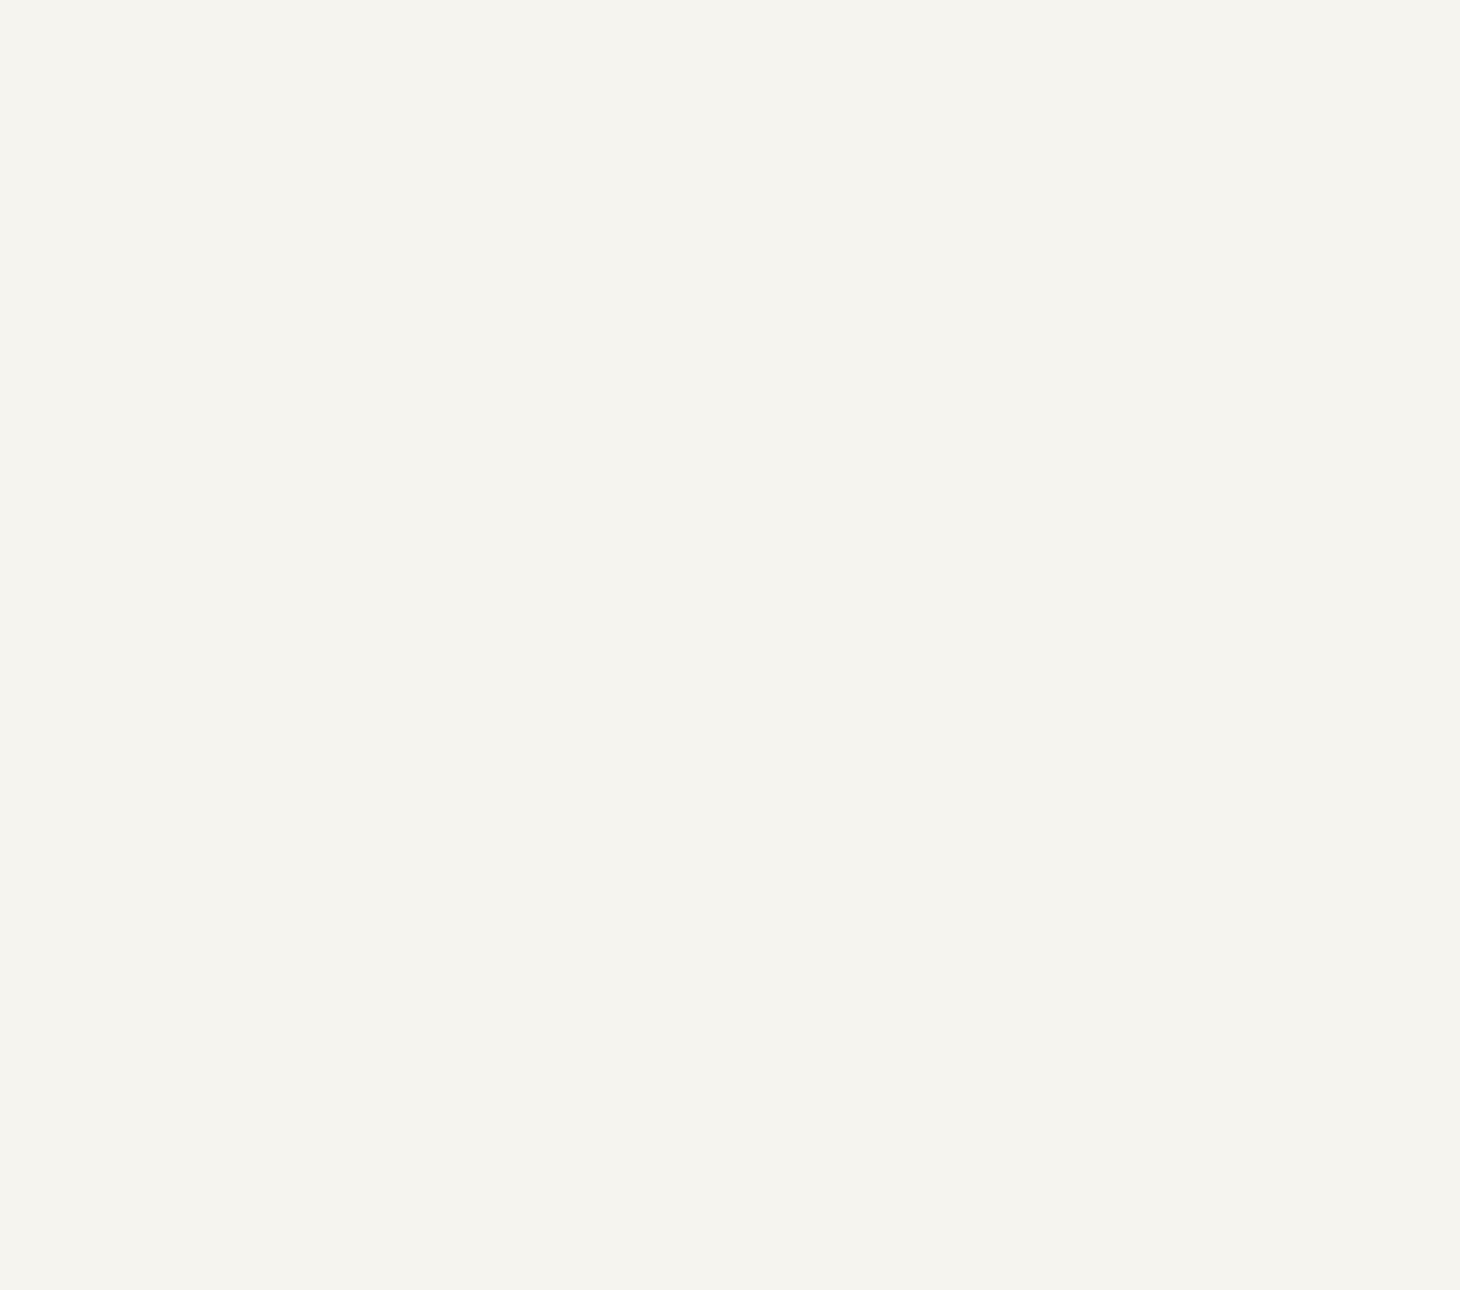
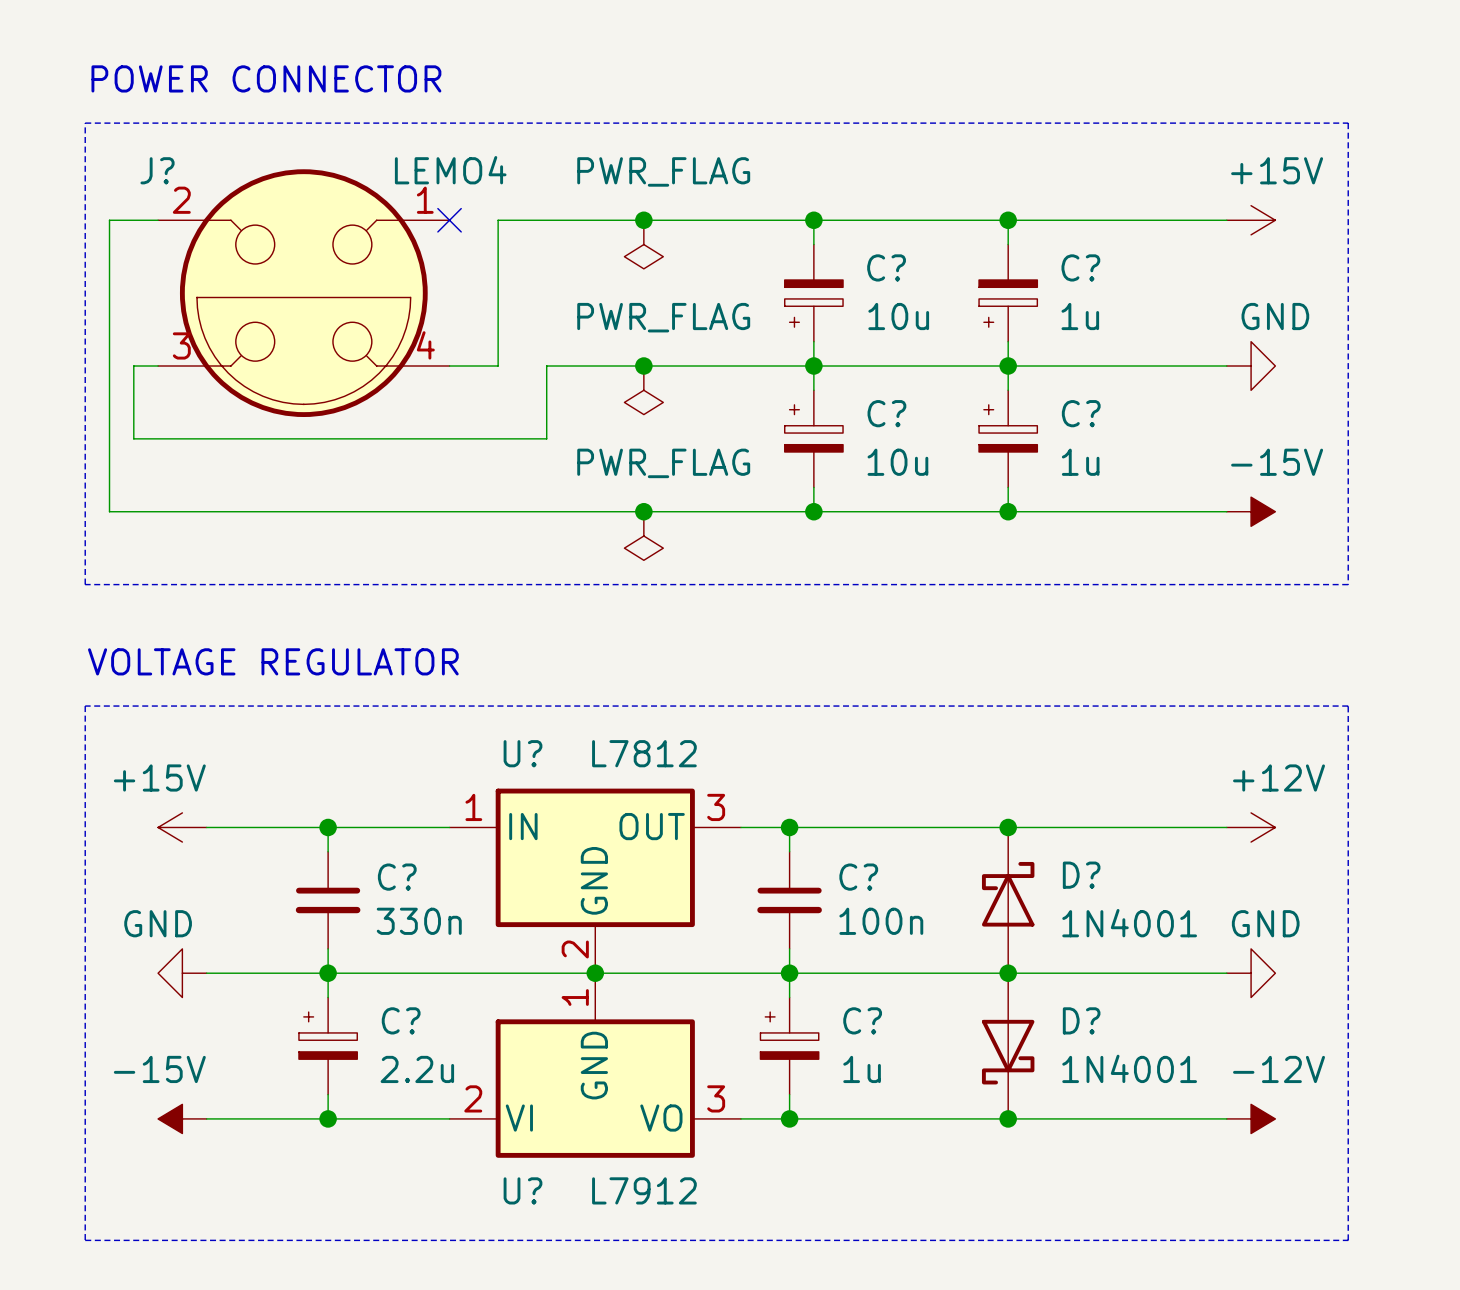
text: none -> POWER CONNECTOR (266, 78)
line: none -> (85, 123) (85, 584) (1348, 584) (1348, 123) (85, 123)
wire: none -> (158, 220) (109, 220) (109, 511) (1226, 511)
no-connect mark: none -> (449, 220)
junction: none -> (643, 220)
wire: none -> (813, 220) (813, 244)
junction: none -> (813, 220)
wire: none -> (1008, 220) (1008, 244)
junction: none -> (1008, 220)
wire: none -> (1226, 220) (498, 220) (498, 366) (449, 366)
power symbol: none -> +15V (1251, 220)
power symbol: none -> PWR_FLAG (643, 244)
J?: none -> LEMO4 (303, 293)
C?: none -> 10u (813, 293)
C?: none -> 1u (1008, 293)
wire: none -> (813, 341) (813, 390)
wire: none -> (1008, 341) (1008, 390)
wire: none -> (158, 366) (133, 366) (133, 438) (546, 438) (546, 366) (1226, 366)
junction: none -> (643, 366)
junction: none -> (813, 366)
junction: none -> (1008, 366)
power symbol: none -> GND (1251, 366)
power symbol: none -> PWR_FLAG (643, 390)
C?: none -> 10u (813, 438)
C?: none -> 1u (1008, 438)
wire: none -> (813, 487) (813, 511)
wire: none -> (1008, 487) (1008, 511)
junction: none -> (643, 511)
junction: none -> (813, 511)
junction: none -> (1008, 511)
power symbol: none -> -15V (1251, 511)
power symbol: none -> PWR_FLAG (643, 536)
text: none -> VOLTAGE REGULATOR (273, 661)
line: none -> (85, 706) (85, 1240) (1348, 1240) (1348, 706) (85, 706)
power symbol: none -> +15V (182, 827)
wire: none -> (206, 827) (449, 827)
wire: none -> (328, 827) (328, 851)
junction: none -> (328, 827)
wire: none -> (741, 827) (1226, 827)
wire: none -> (789, 827) (789, 851)
junction: none -> (789, 827)
junction: none -> (1008, 827)
power symbol: none -> +12V (1251, 827)
U?: none -> L7812 (595, 880)
C?: none -> 330n (328, 900)
C?: none -> 100n (789, 900)
D?: none -> 1N4001 (1008, 900)
wire: none -> (328, 948) (328, 997)
wire: none -> (789, 948) (789, 997)
power symbol: none -> GND (182, 973)
wire: none -> (206, 973) (1226, 973)
junction: none -> (328, 973)
junction: none -> (595, 973)
junction: none -> (789, 973)
junction: none -> (1008, 973)
power symbol: none -> GND (1251, 973)
C?: none -> 2.2u (328, 1046)
C?: none -> 1u (789, 1046)
D?: none -> 1N4001 (1008, 1046)
U?: none -> L7912 (595, 1065)
wire: none -> (328, 1094) (328, 1118)
wire: none -> (789, 1094) (789, 1118)
power symbol: none -> -15V (182, 1118)
wire: none -> (206, 1118) (449, 1118)
junction: none -> (328, 1118)
wire: none -> (741, 1118) (1226, 1118)
junction: none -> (789, 1118)
junction: none -> (1008, 1118)
power symbol: none -> -12V (1251, 1118)

